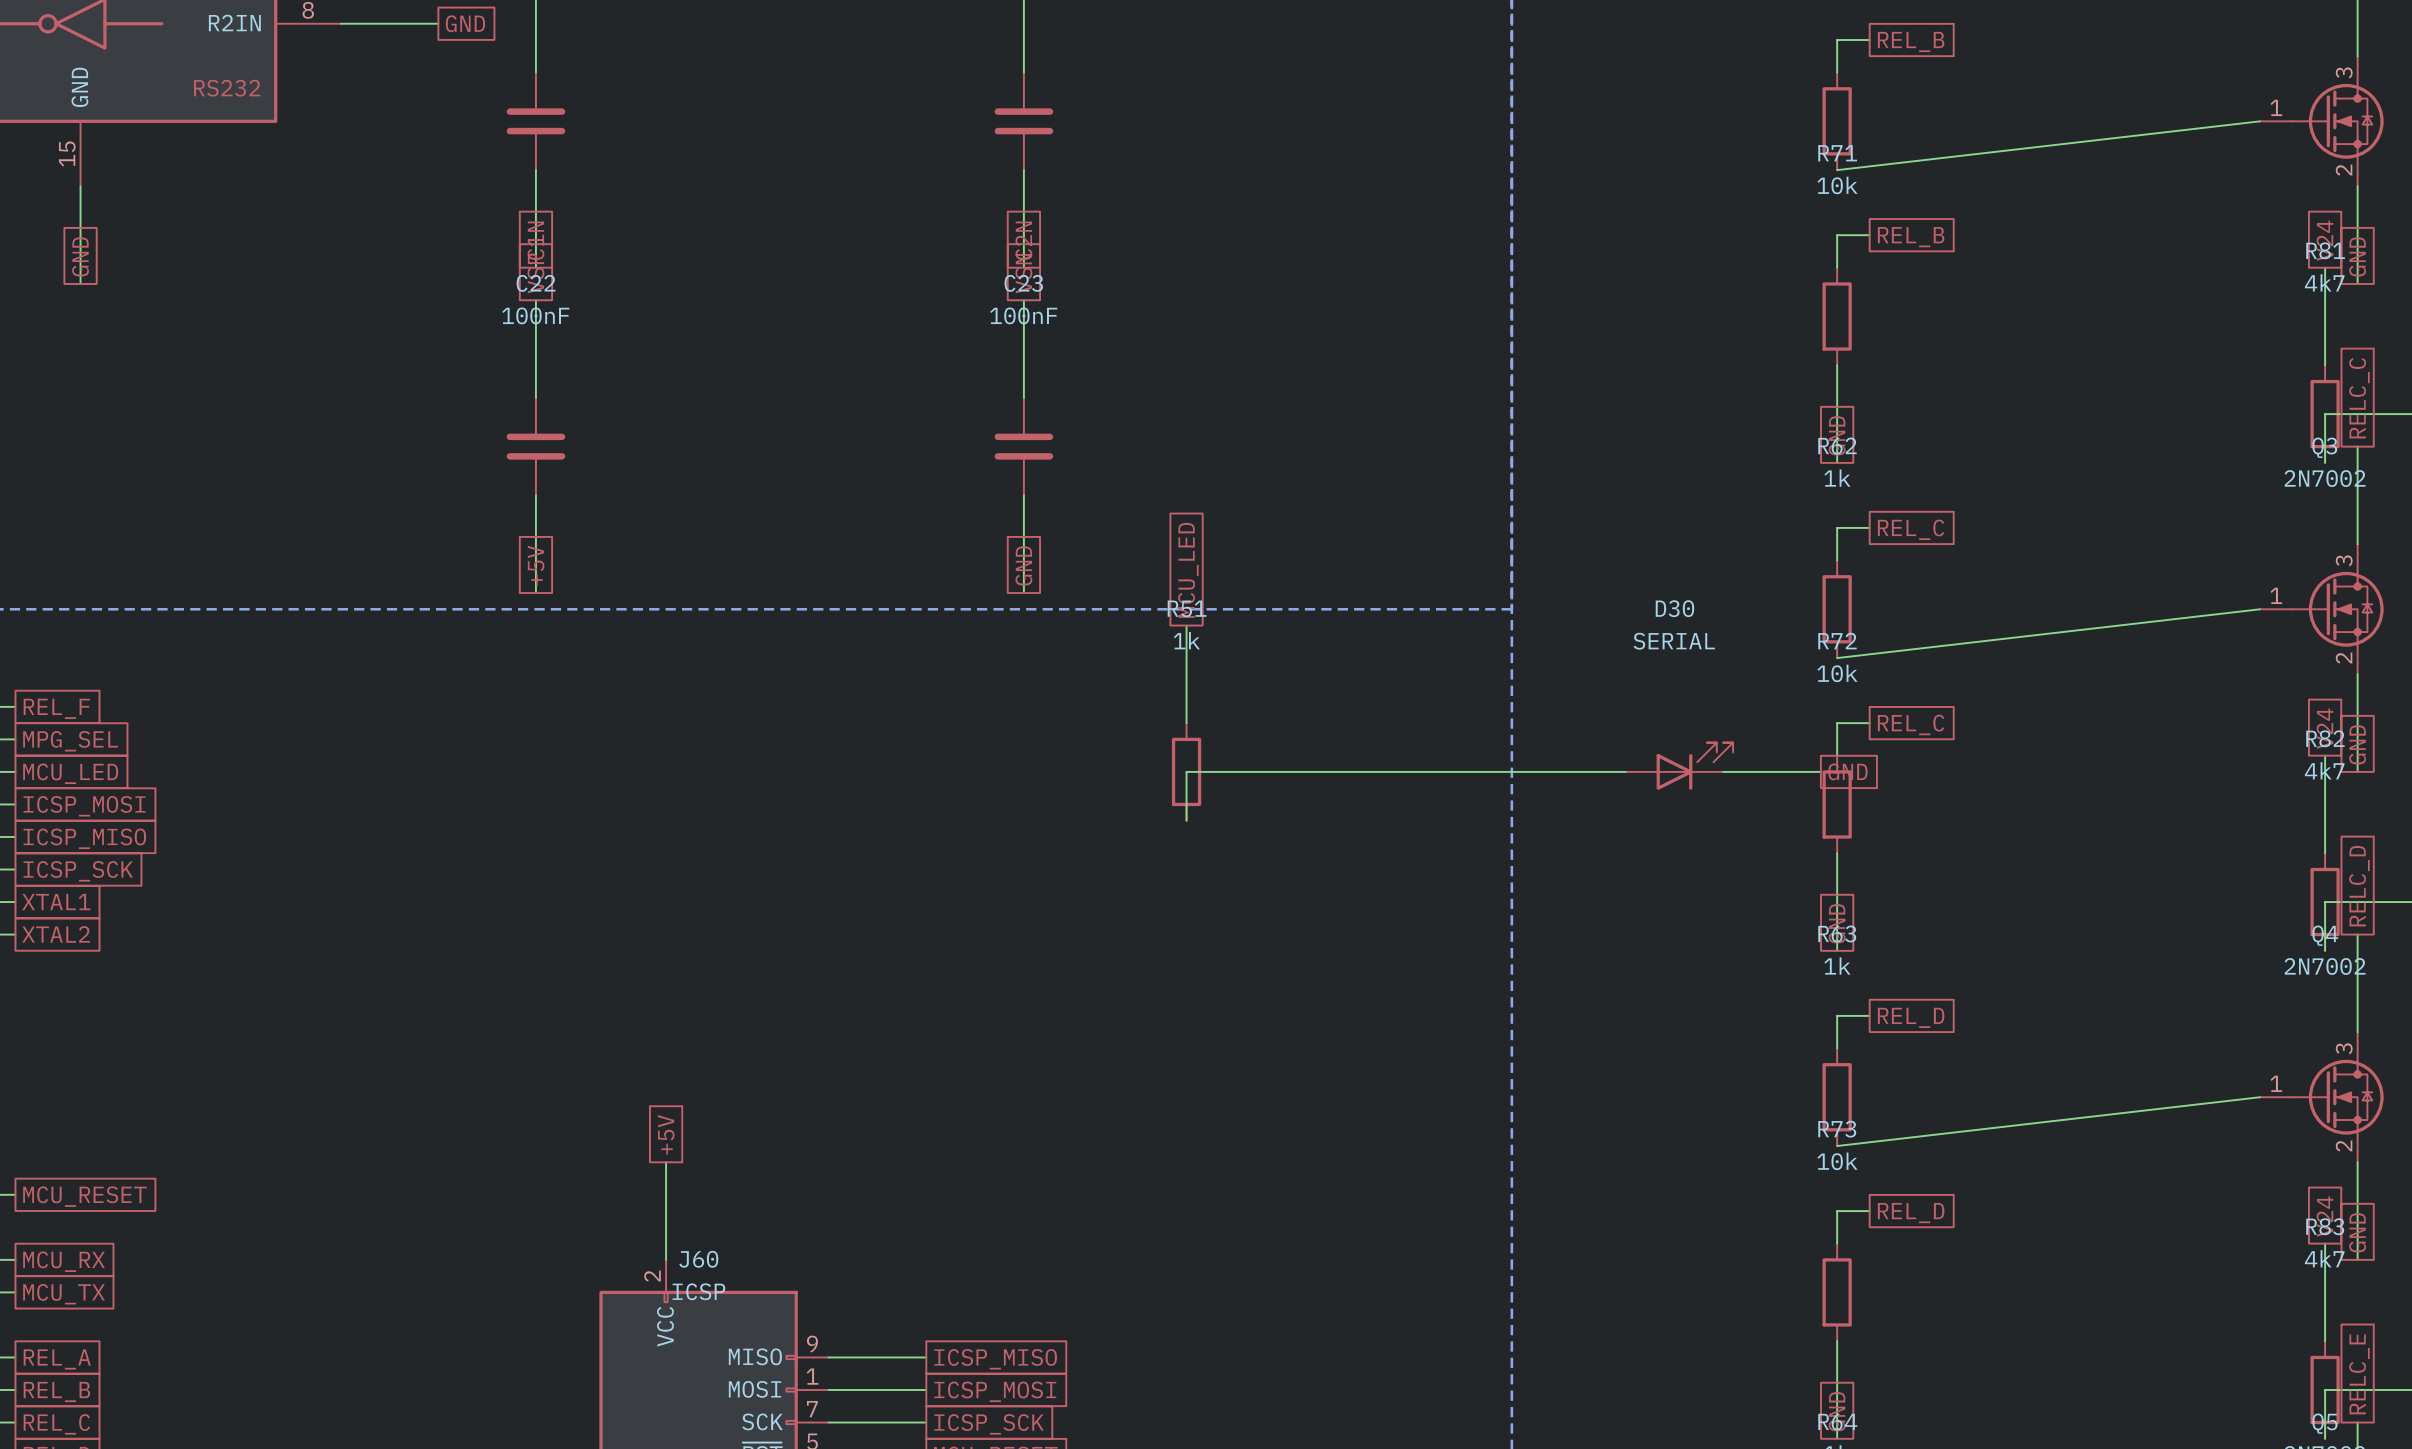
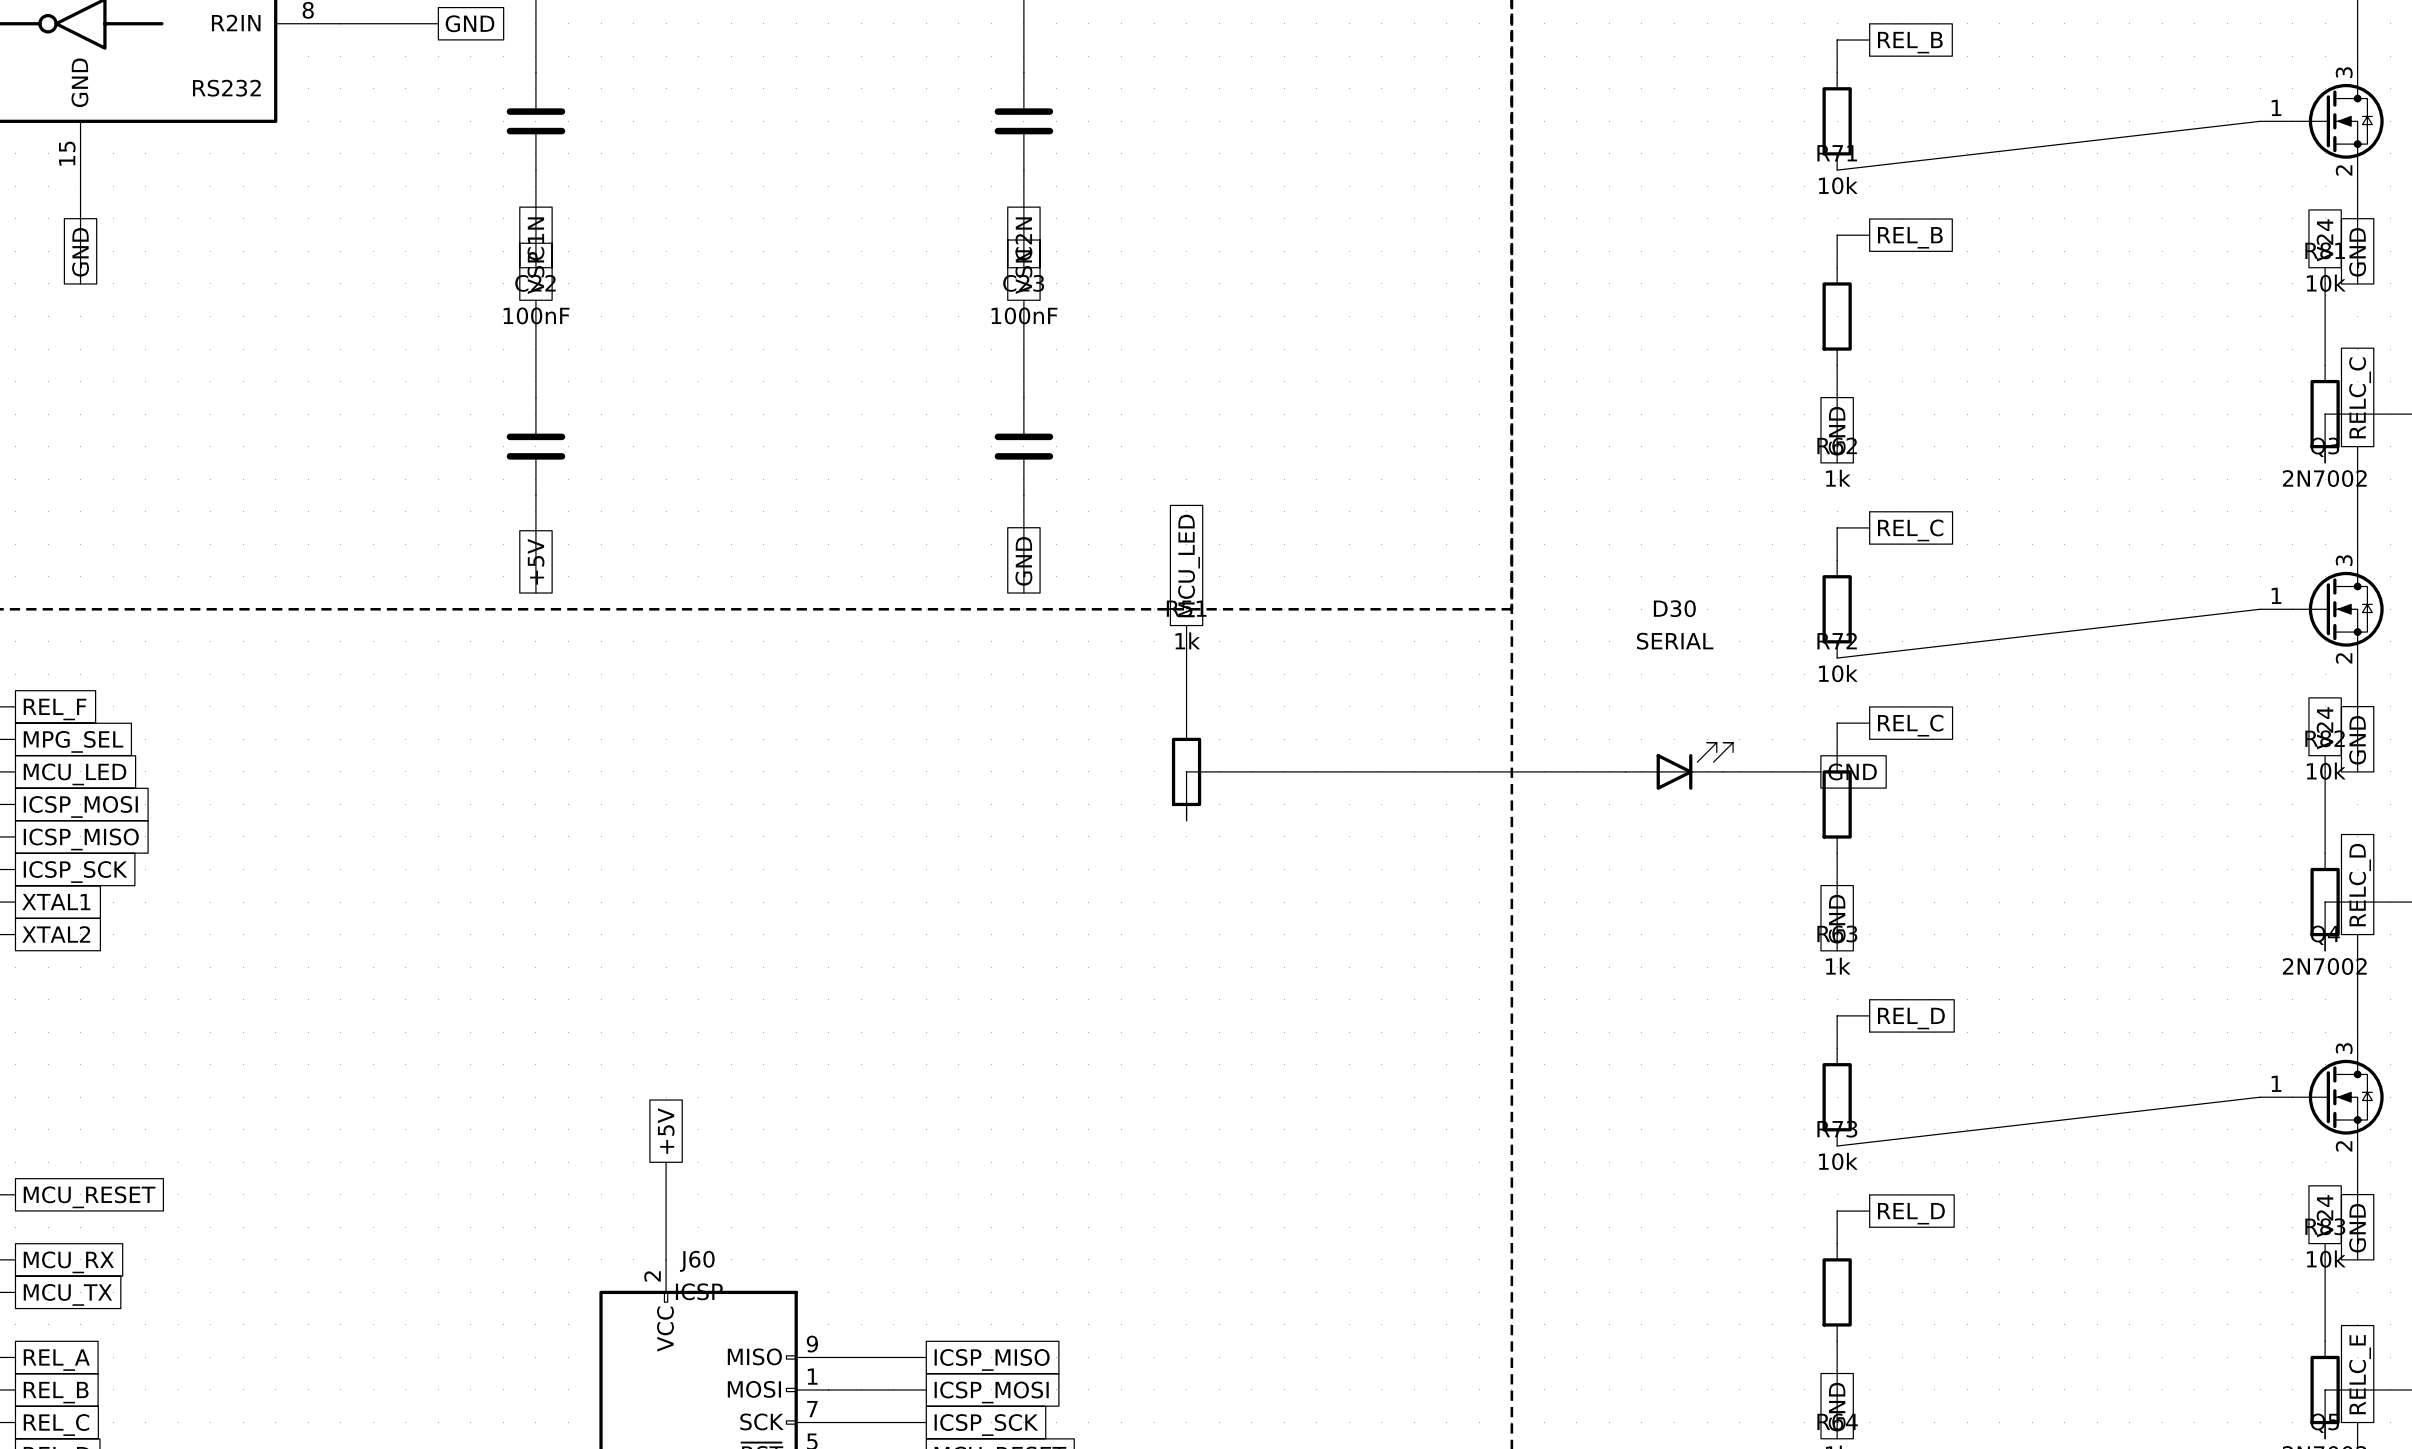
R81 value: 4k7 (2324, 282) -> 10k (2326, 283)
R82 value: 4k7 (2324, 770) -> 10k (2326, 771)
R83 value: 4k7 (2324, 1258) -> 10k (2326, 1259)

